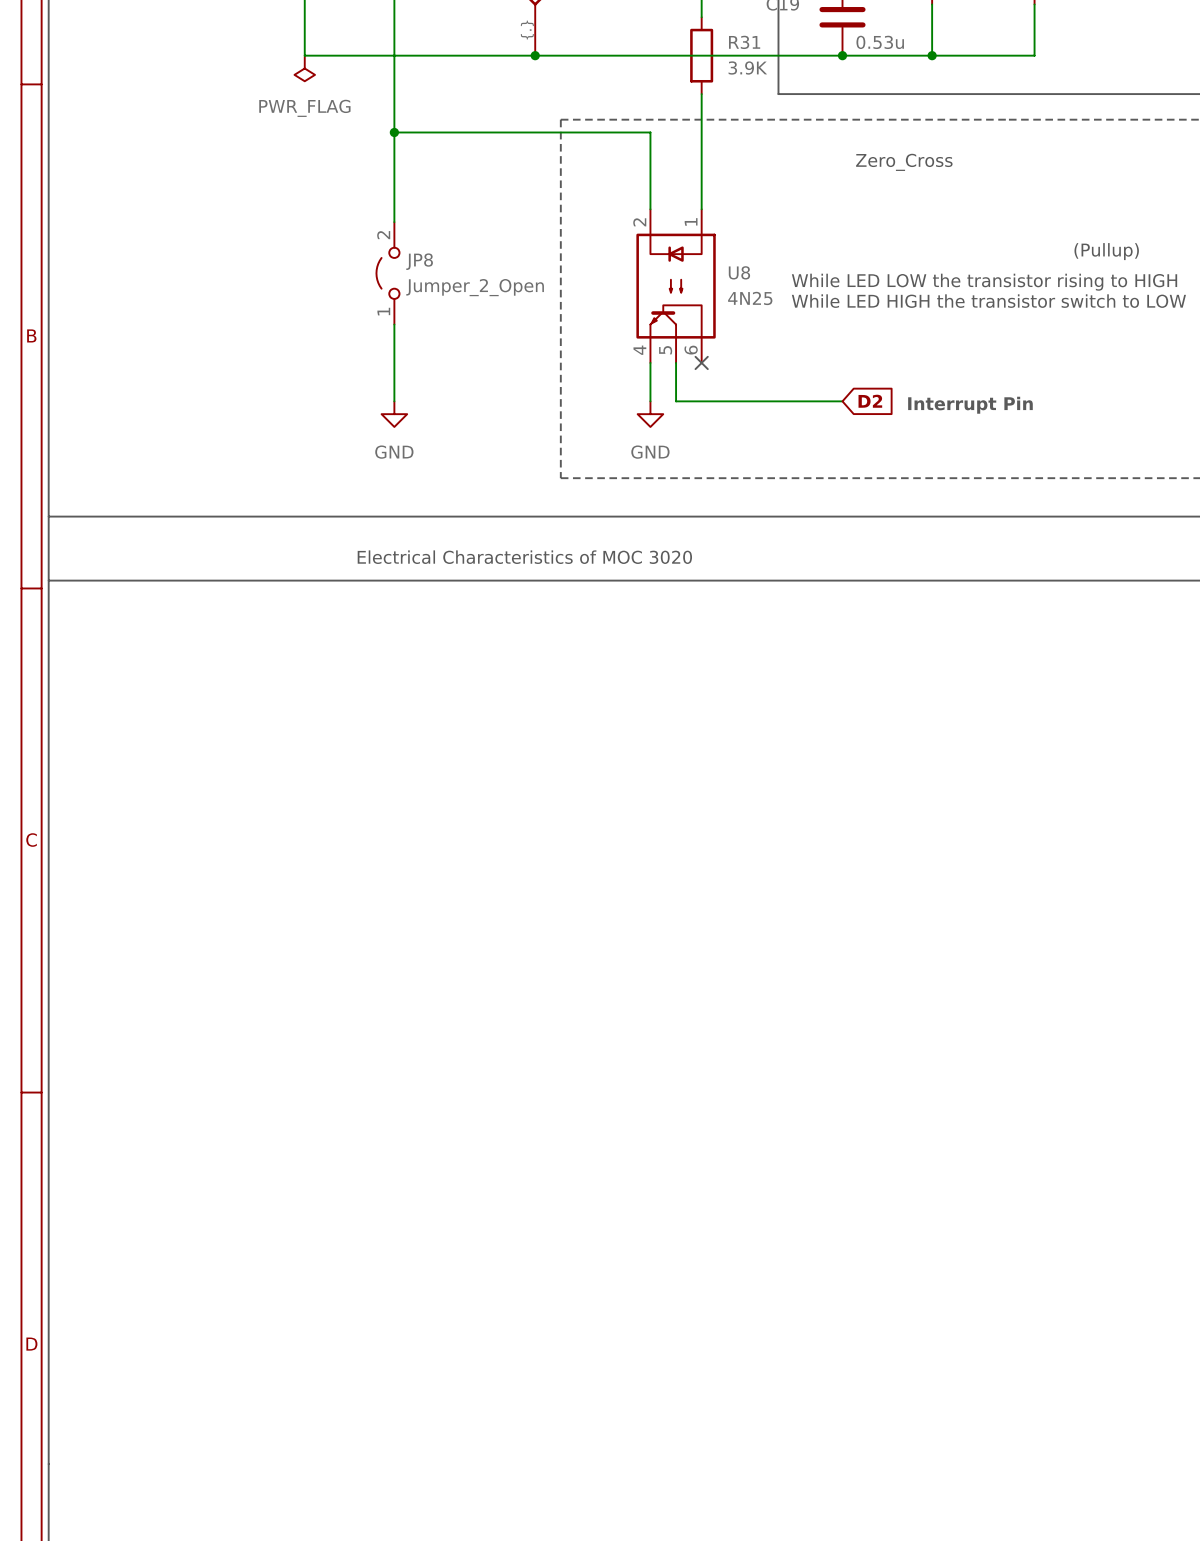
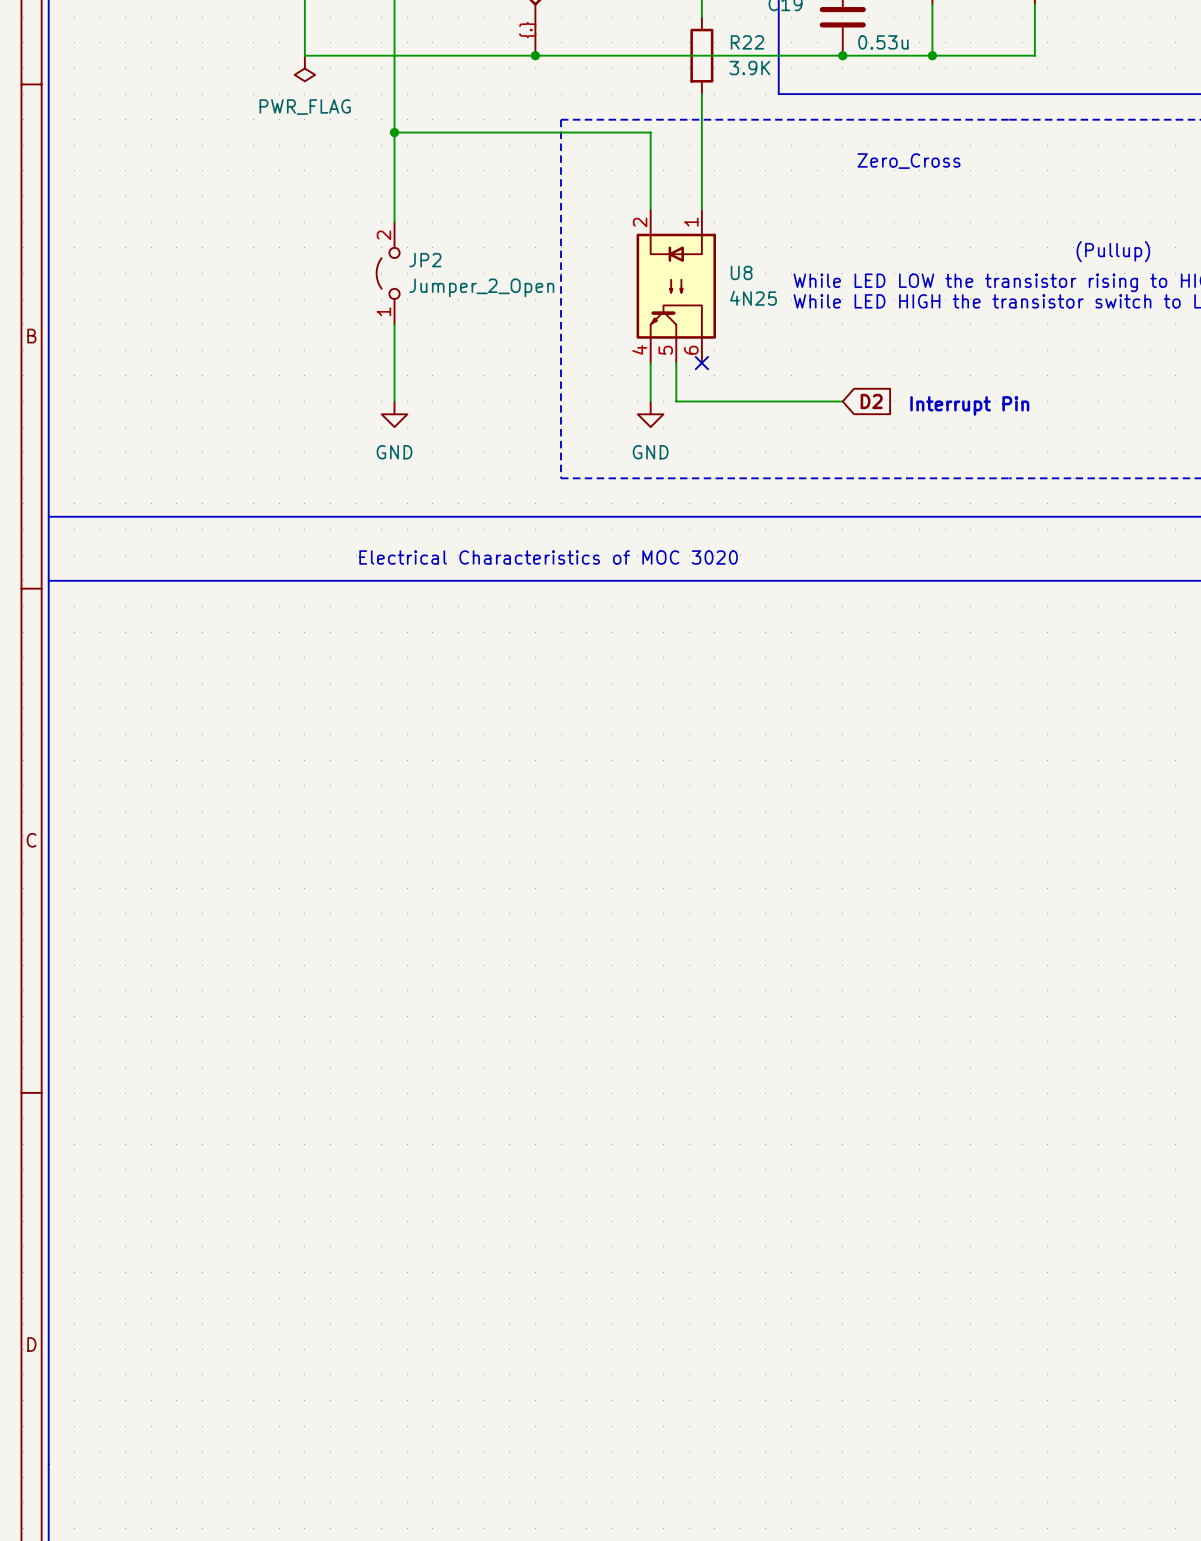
R31 name: R31 (744, 42) -> R22 (747, 42)
JP8 name: JP8 (419, 261) -> JP2 (425, 260)

